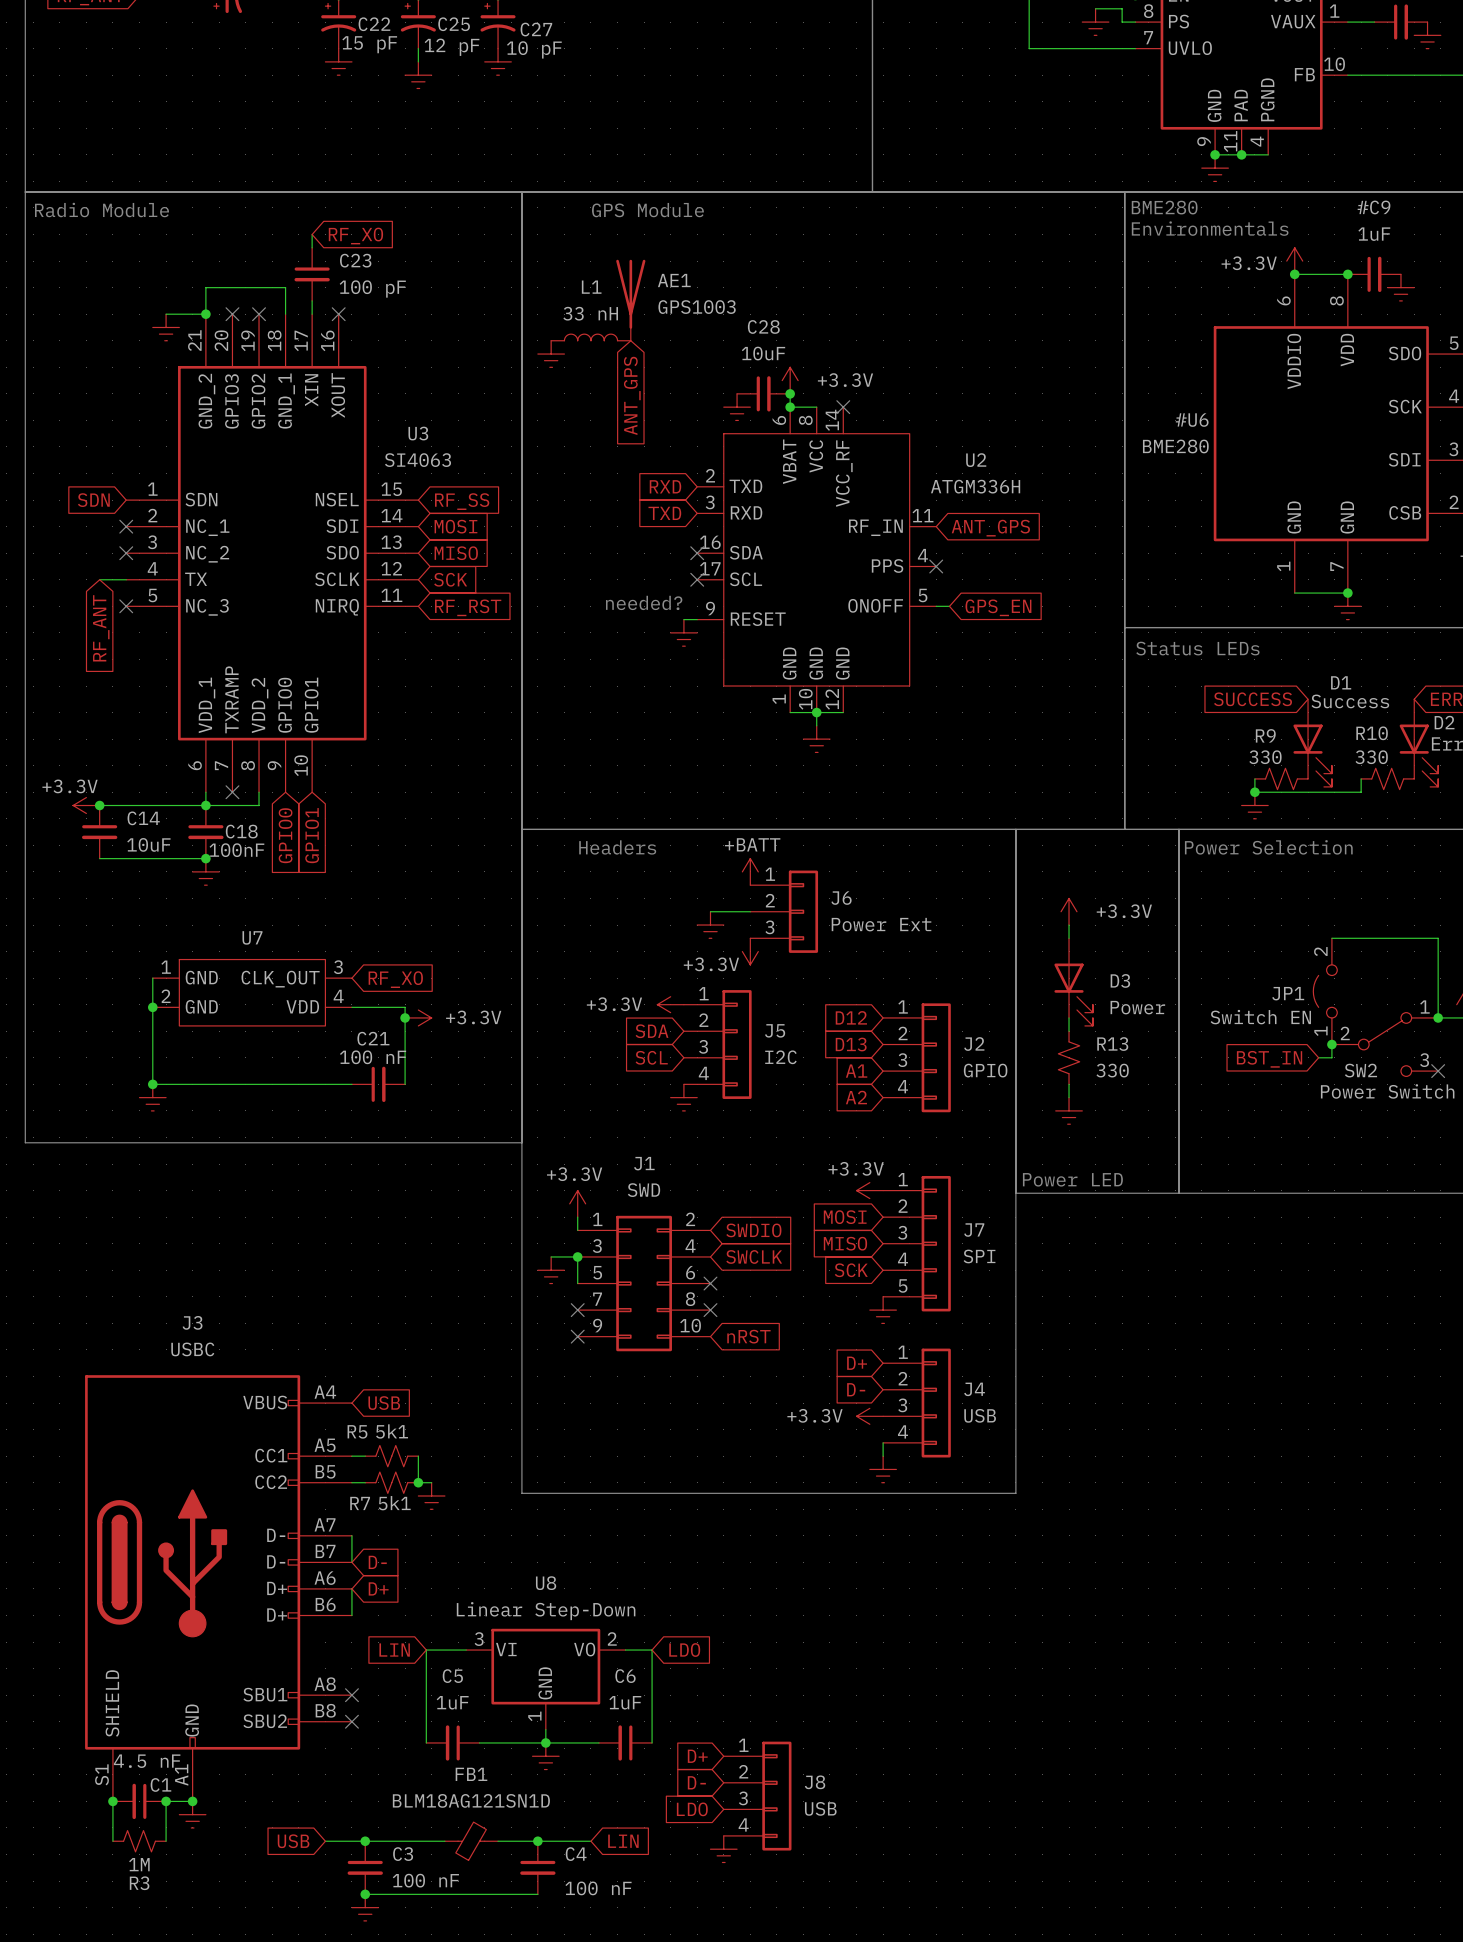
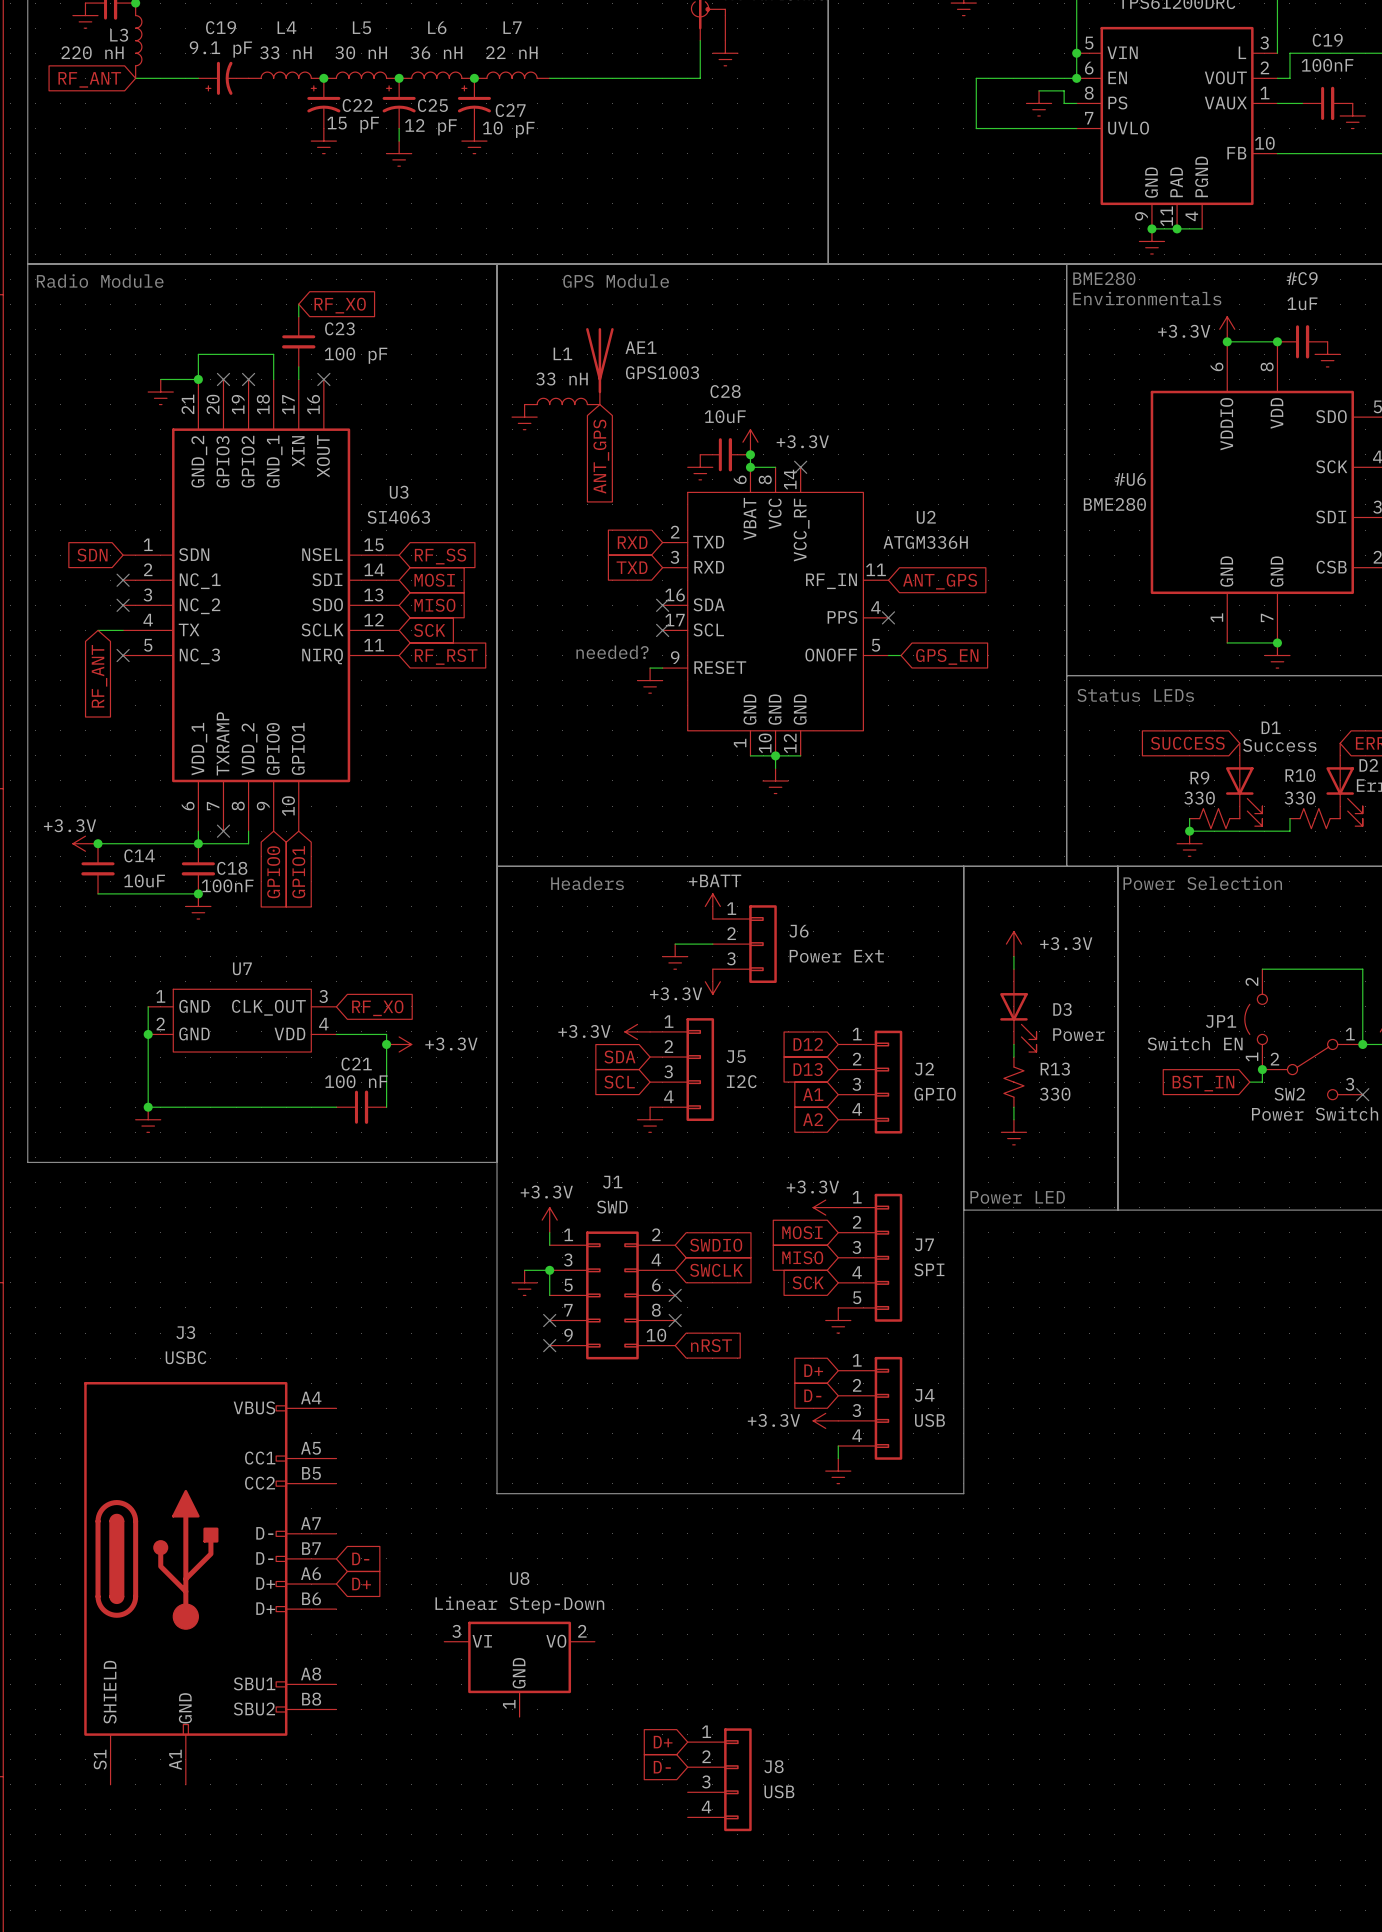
global label: USB (384, 1403) -> none
wire: (351, 1456) (365, 1456) -> none
R5: 5k1 (391, 1456) -> none
wire: (418, 1456) (418, 1482) (431, 1482) -> none
wire: (351, 1482) (365, 1482) -> none
R7: 5k1 (391, 1482) -> none
junction: (418, 1482) -> none
power symbol: (431, 1495) -> none
wire: (351, 1535) (351, 1562) -> none
wire: (351, 1588) (351, 1615) -> none
global label: LIN (394, 1650) -> none
wire: (466, 1650) (426, 1650) (426, 1742) -> none
wire: (625, 1650) (652, 1650) (652, 1742) -> none
global label: LDO (684, 1650) -> none
no-connect mark: (351, 1695) -> none
no-connect mark: (351, 1721) -> none
wire: (545, 1729) (545, 1742) -> none
C5: 1uF (452, 1742) -> none
wire: (479, 1742) (598, 1742) -> none
junction: (545, 1742) -> none
C6: 1uF (625, 1742) -> none
power symbol: (545, 1756) -> none
wire: (112, 1801) (112, 1841) -> none
junction: (112, 1801) -> none
C1: 4.5 nF (139, 1801) -> none
junction: (166, 1801) -> none
wire: (192, 1801) (166, 1801) (166, 1841) -> none
junction: (192, 1801) -> none
global label: LDO (692, 1809) -> none
power symbol: (192, 1814) -> none
R3: 1M (139, 1841) -> none
global label: USB (293, 1841) -> none
wire: (325, 1841) (444, 1841) -> none
junction: (365, 1841) -> none
FB1: BLM18AG121SN1D (471, 1841) -> none
wire: (498, 1841) (590, 1841) -> none
junction: (537, 1841) -> none
global label: LIN (623, 1841) -> none
power symbol: (723, 1849) -> none
C3: 100 nF (365, 1867) -> none
C4: 100 nF (537, 1867) -> none
wire: (365, 1894) (537, 1894) -> none
junction: (365, 1894) -> none
power symbol: (365, 1907) -> none

